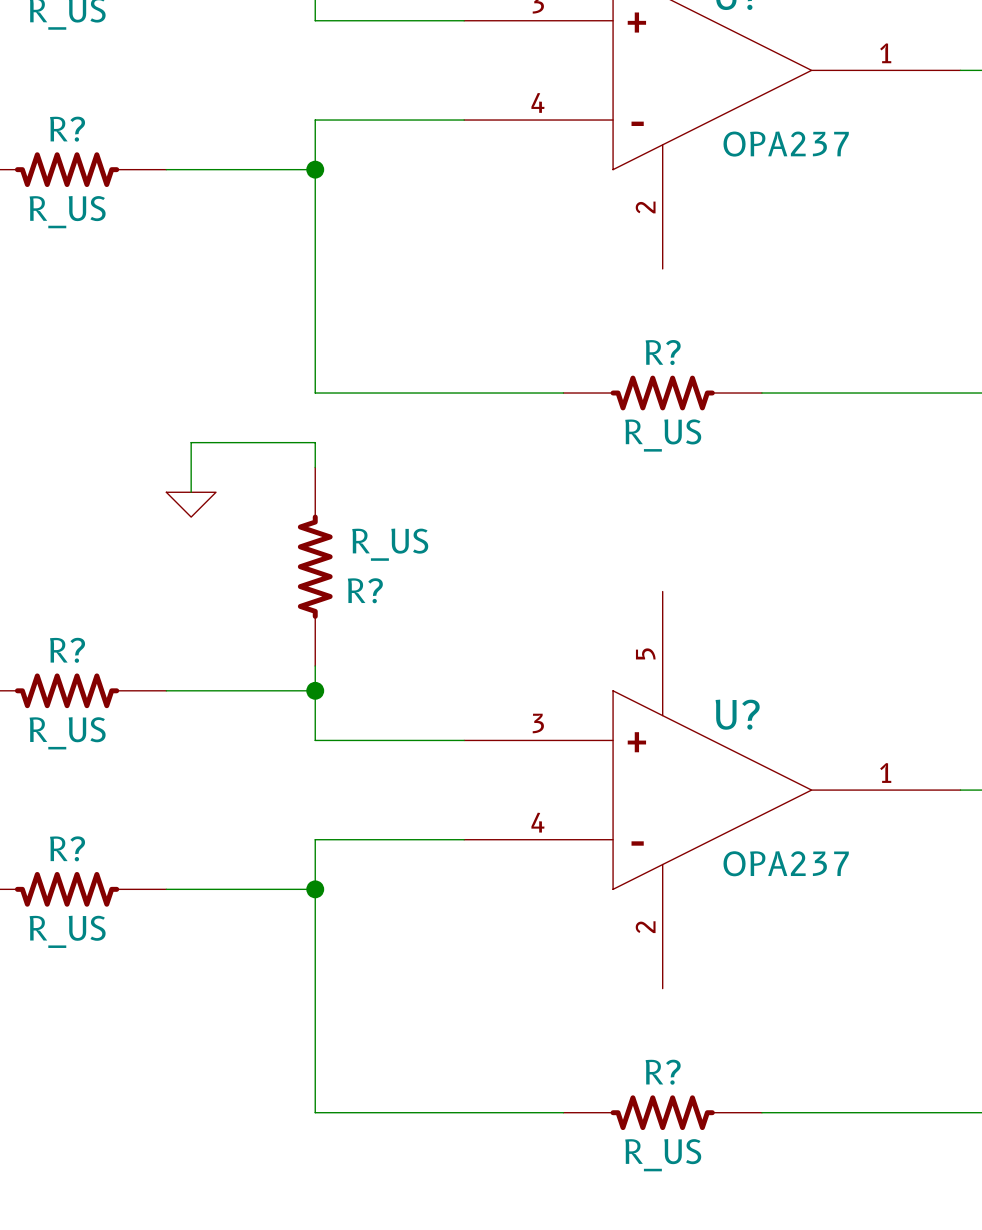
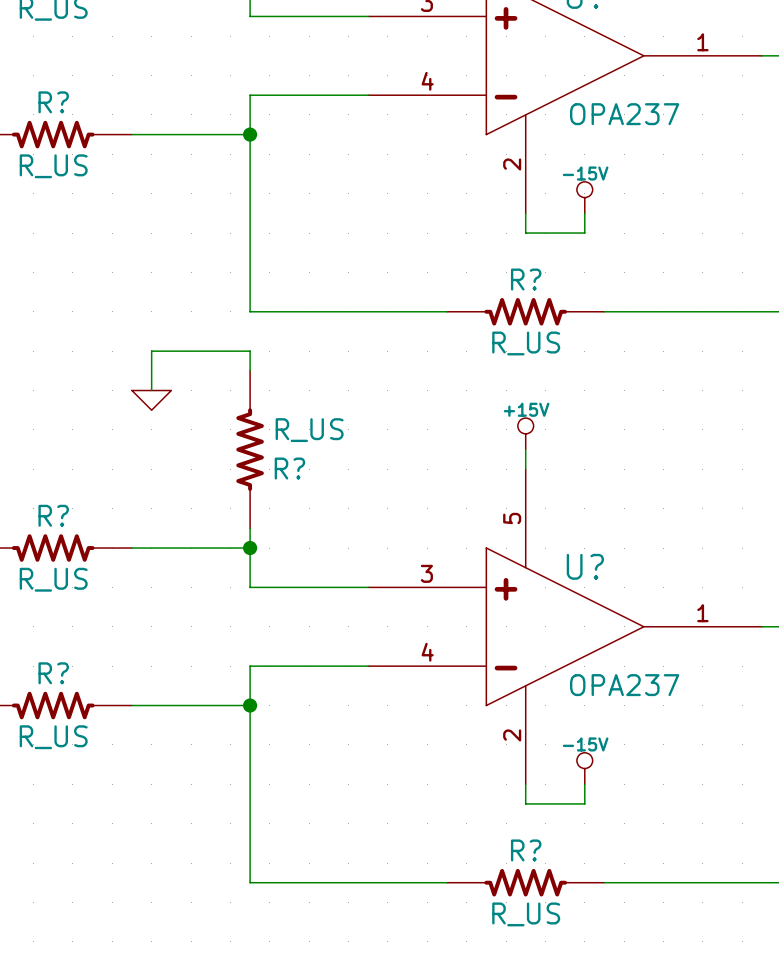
power symbol: none -> -15V (584, 197)
wire: none -> (525, 213) (525, 233) (584, 233) (584, 213)
power symbol: none -> +15V (525, 433)
wire: none -> (525, 449) (525, 469)
power symbol: none -> -15V (584, 768)
wire: none -> (525, 784) (525, 803) (584, 803) (584, 784)

